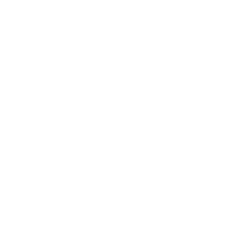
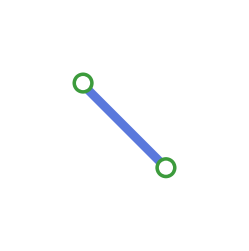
track: none -> (83, 83) (165, 167)
via: none -> (83, 83)
via: none -> (165, 167)

